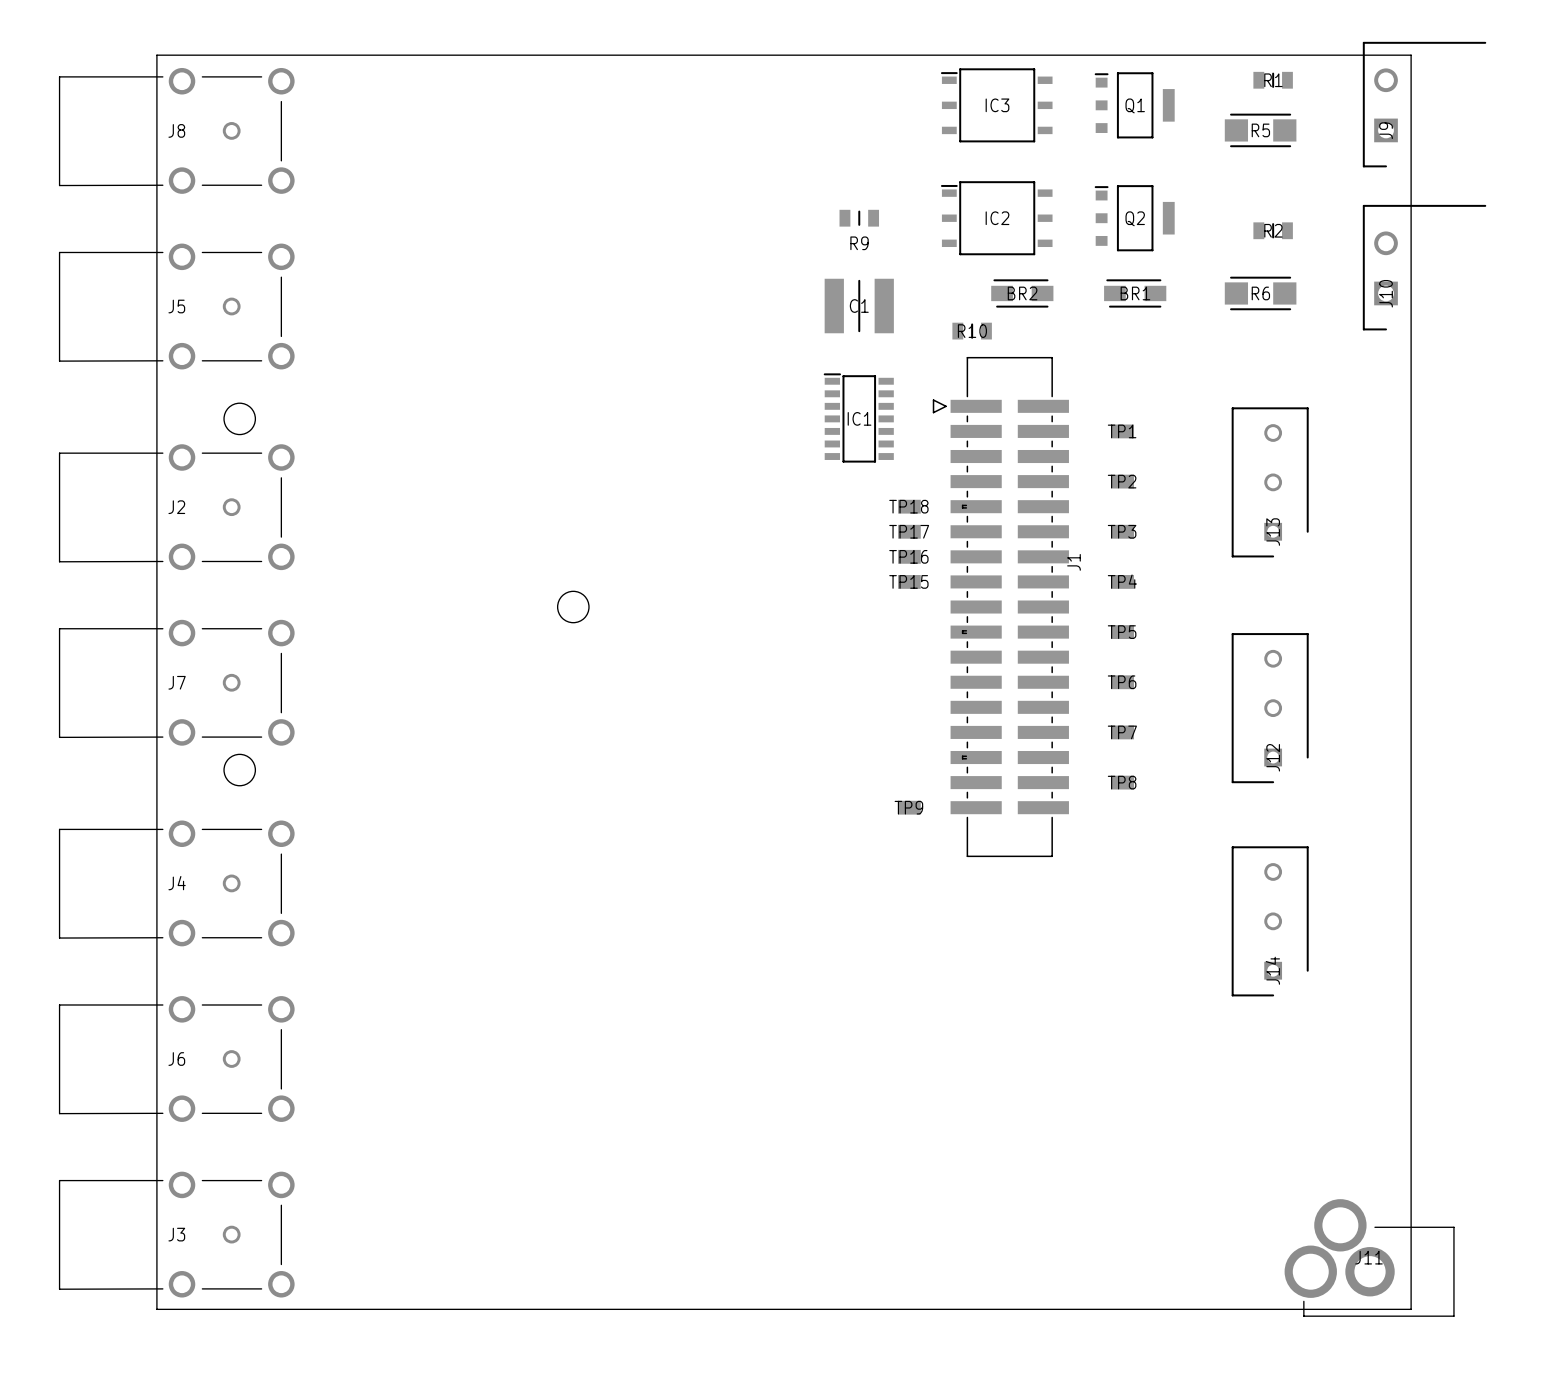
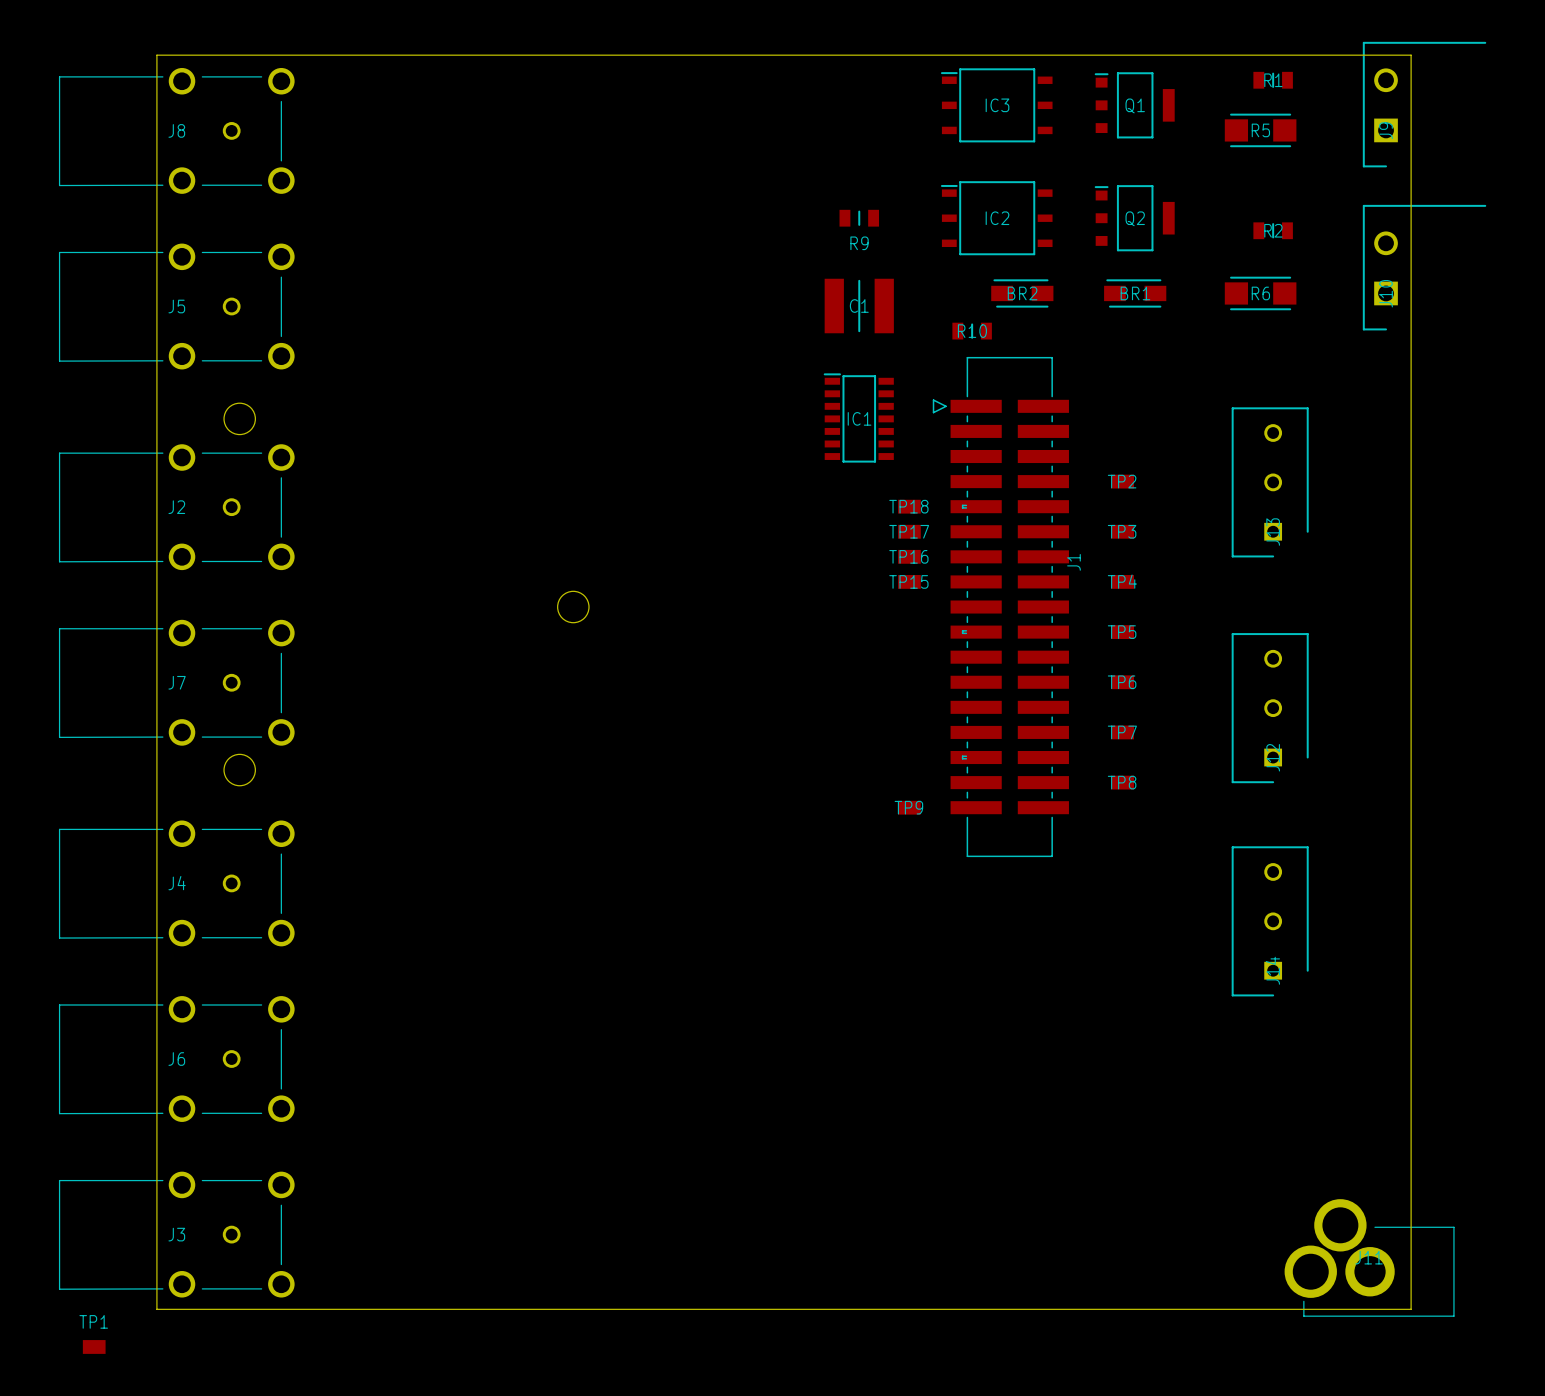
TP1 position: (1122, 431) -> (94, 1346)
TP1 name position: TP1 (1122, 431) -> TP1 (93, 1321)

